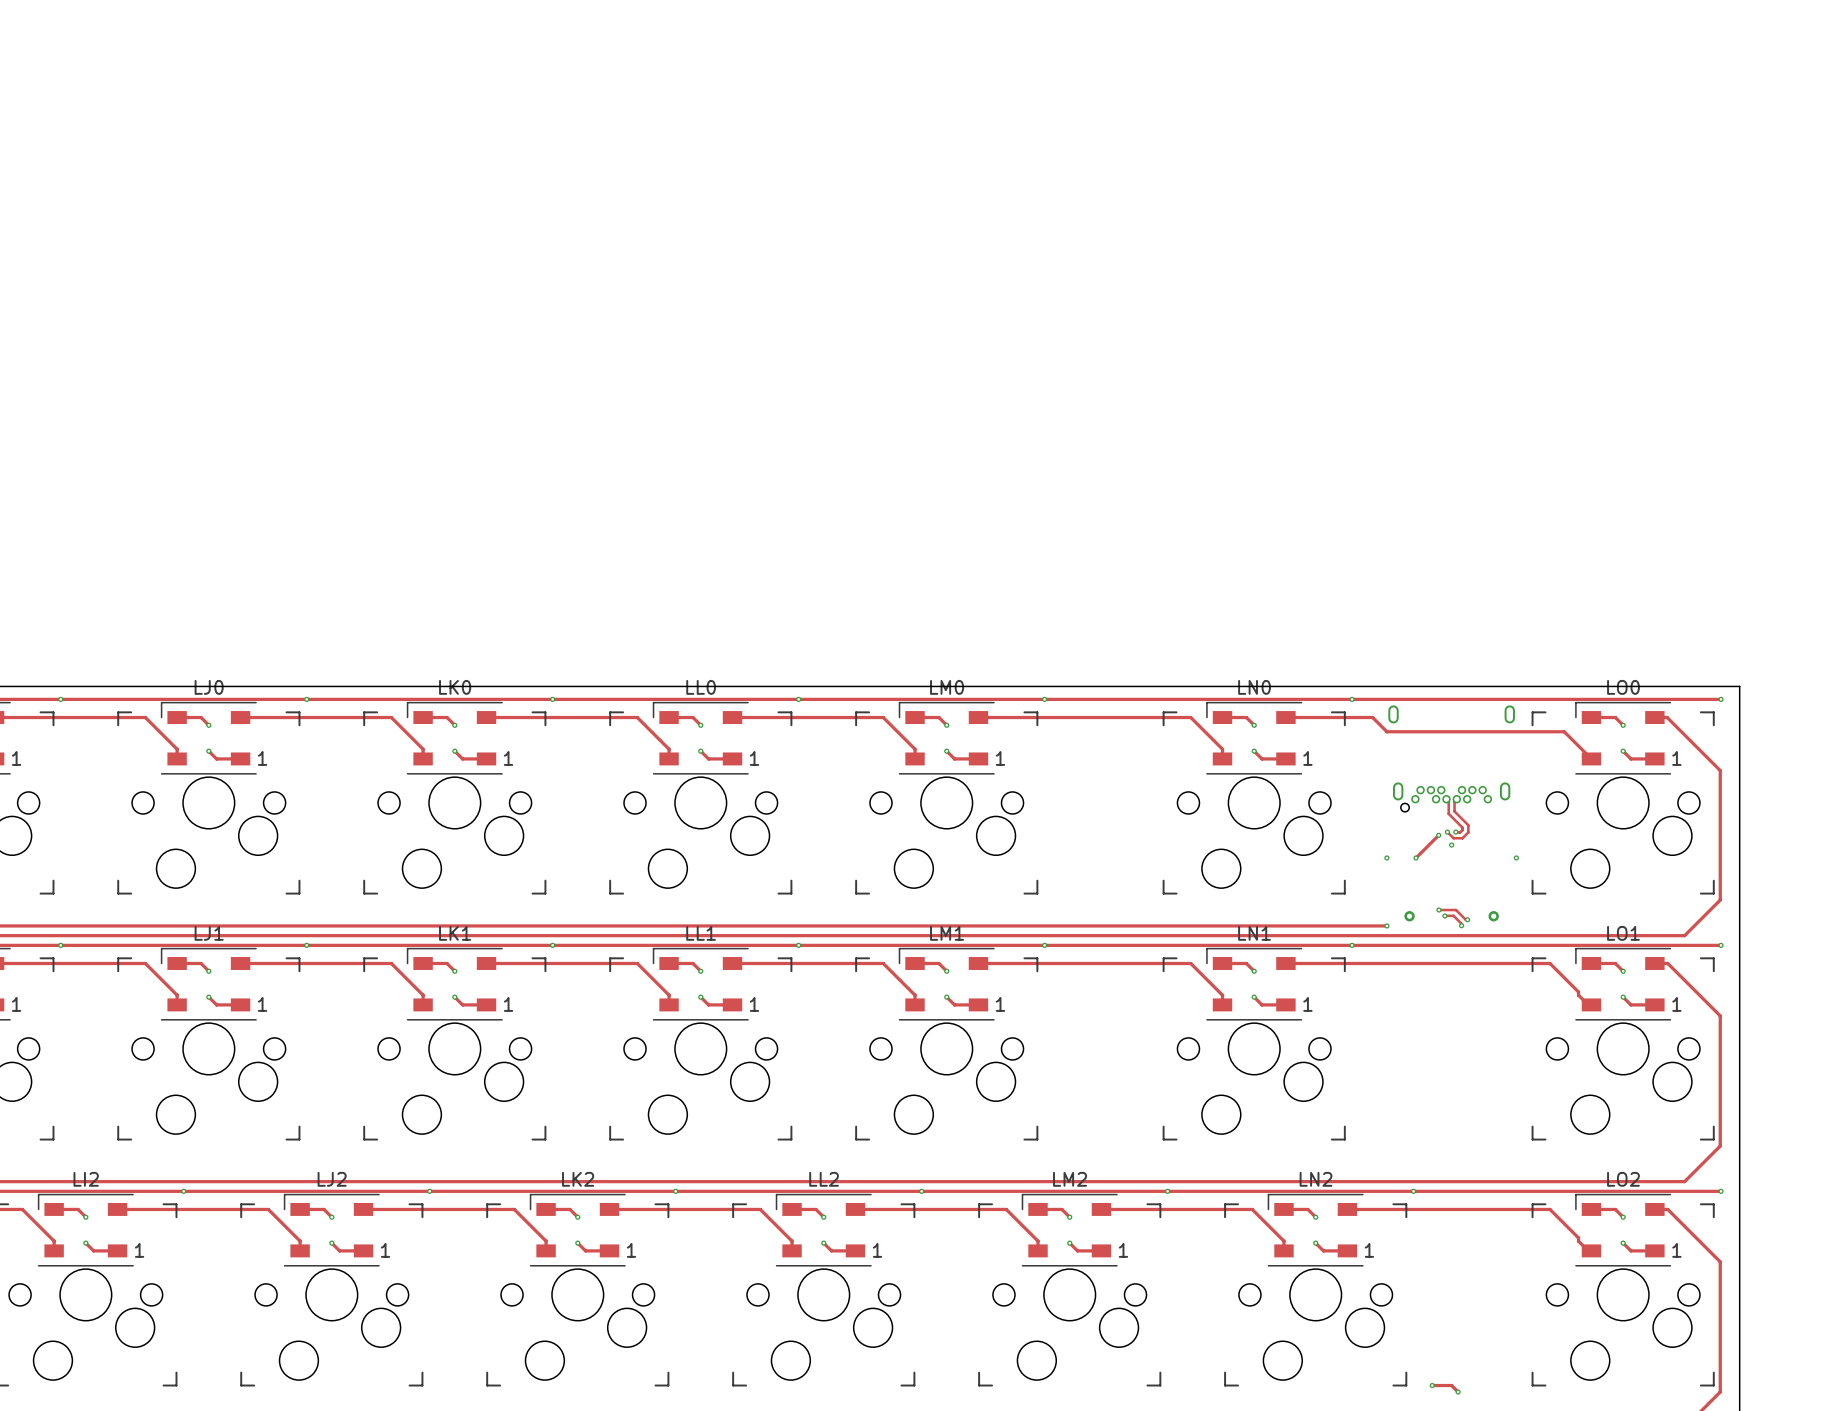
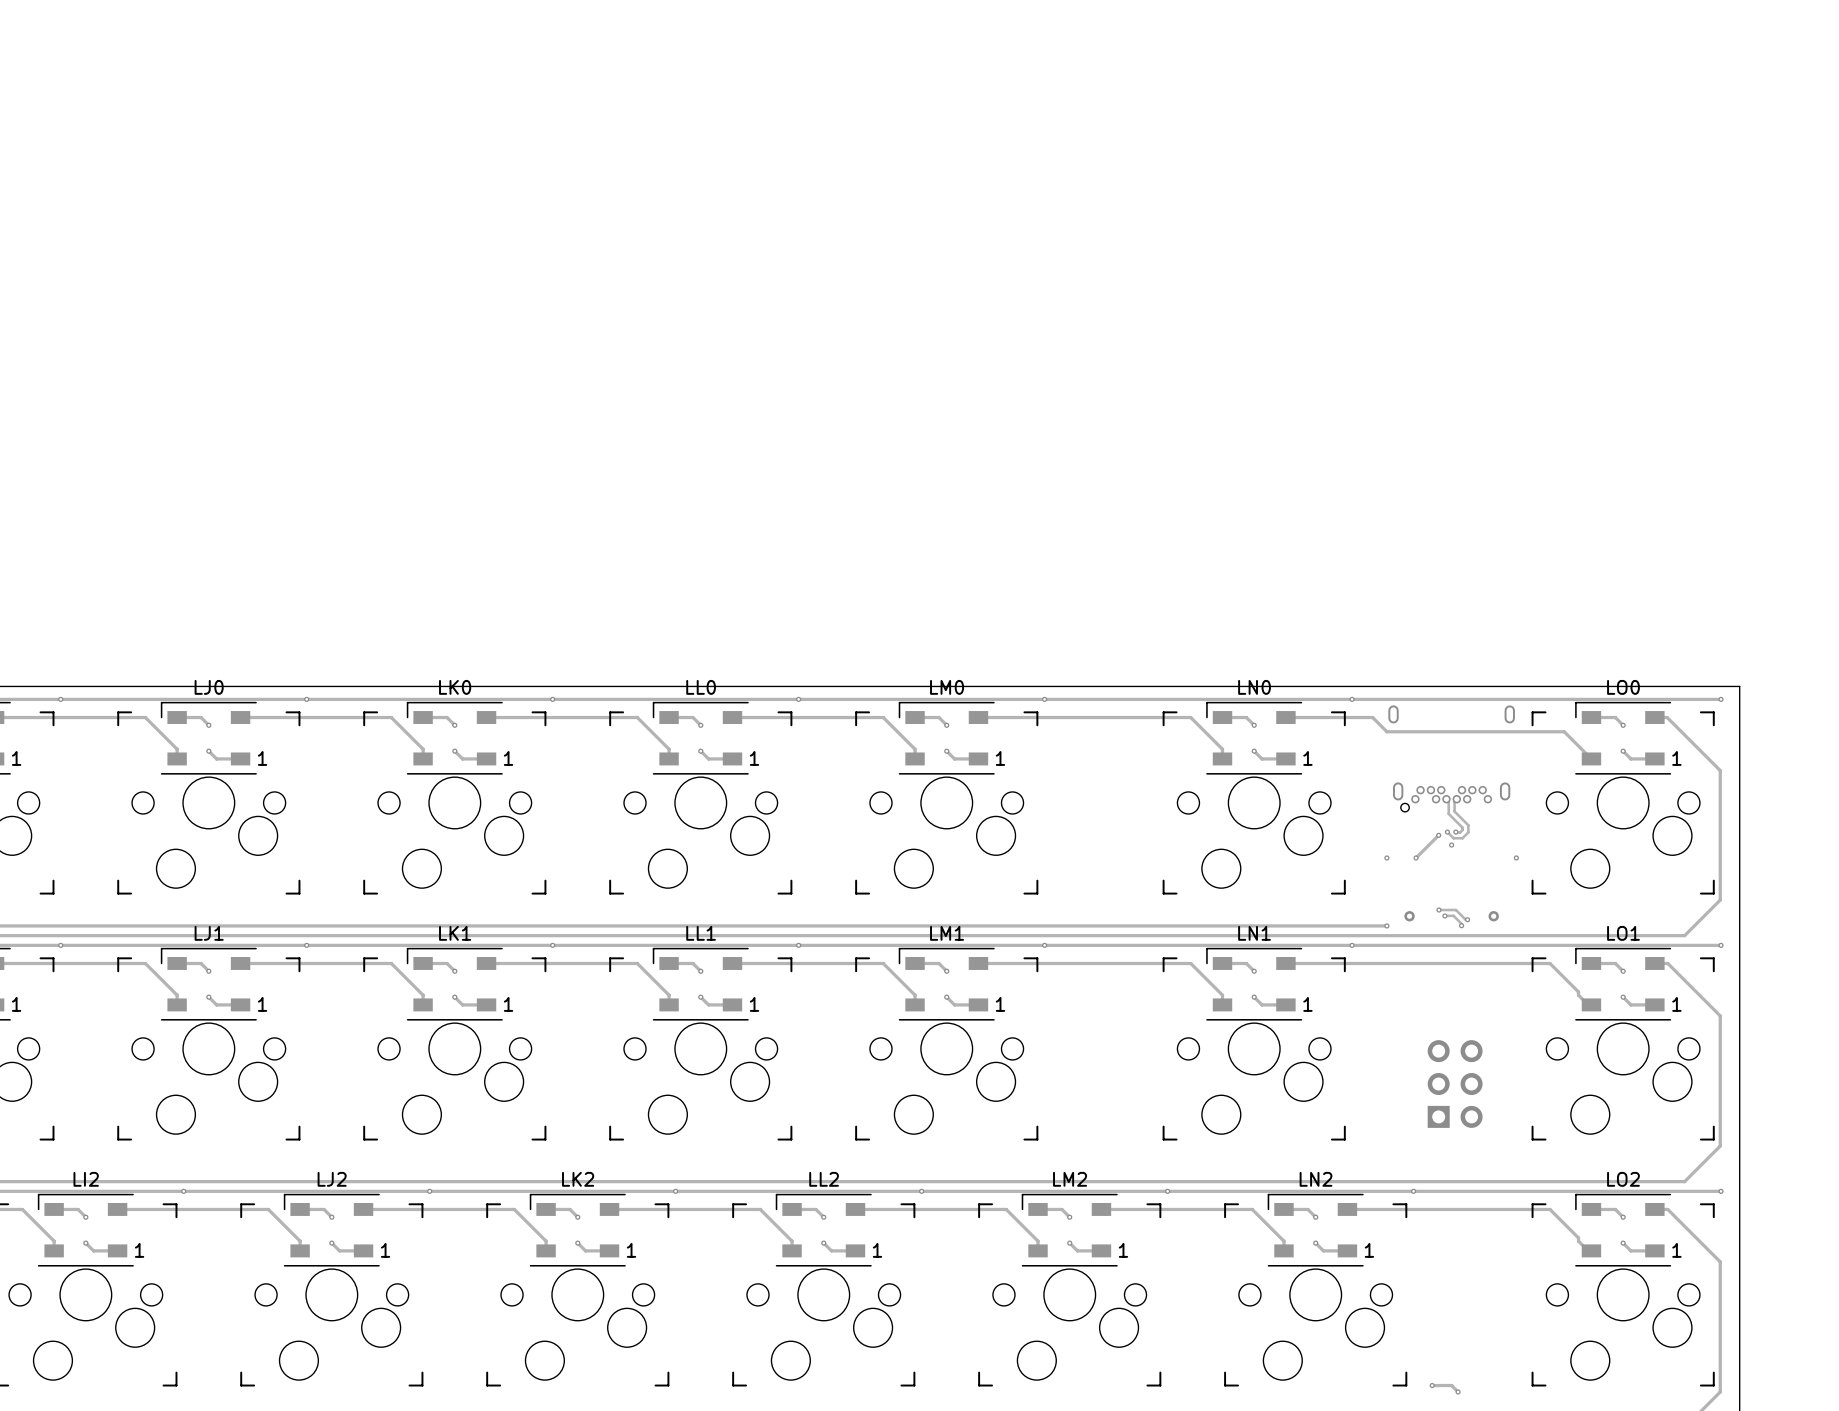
part: none -> (1455, 1084)

